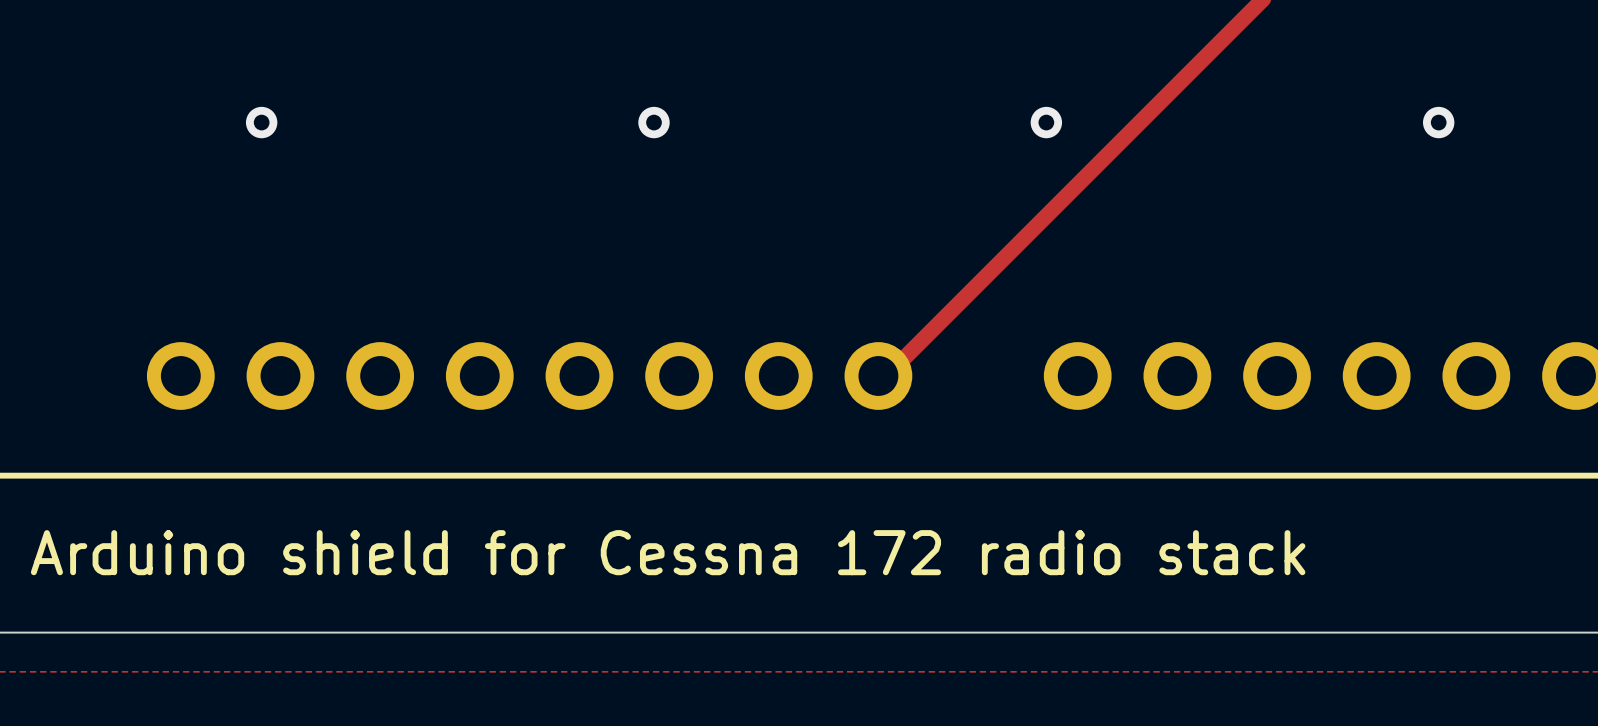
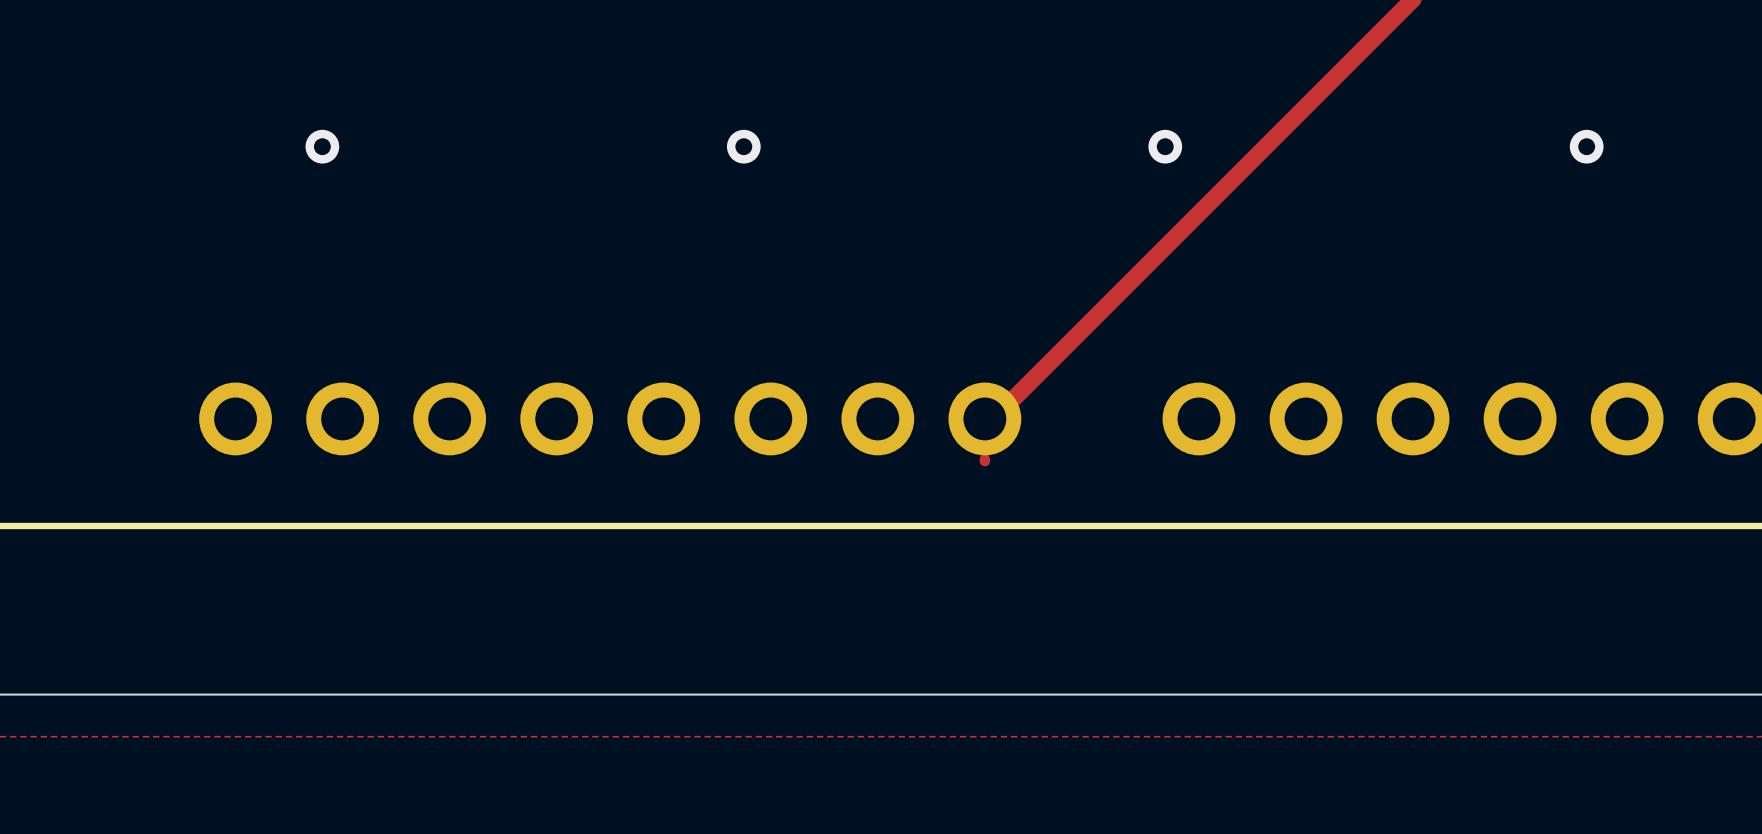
track: none -> (984, 459) (984, 461)
text: Arduino shield for Cessna 172 radio stack (668, 552) -> none

